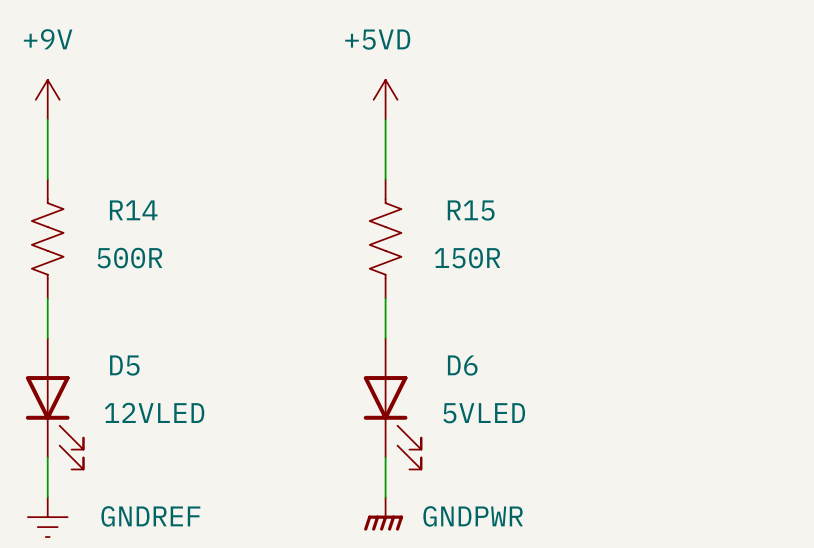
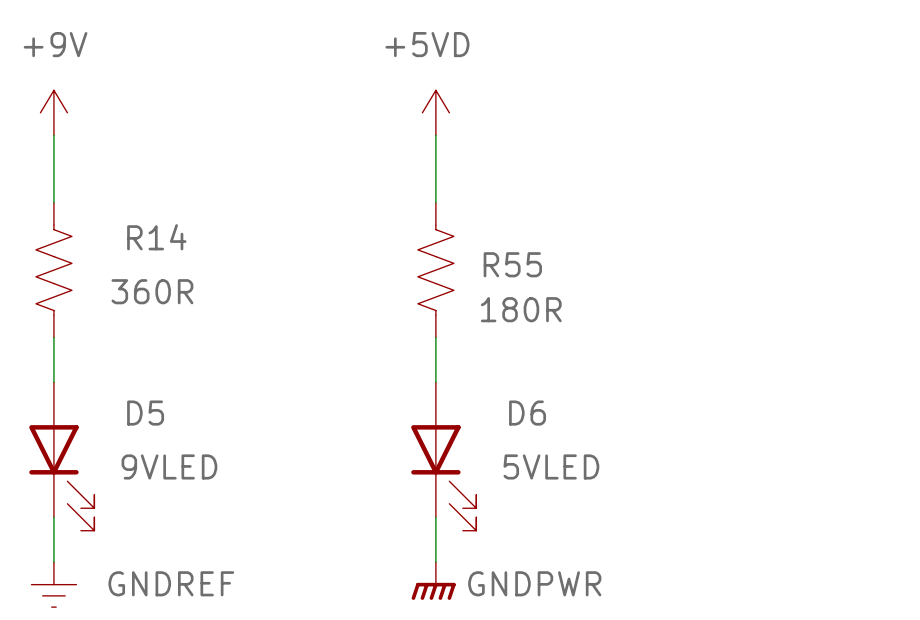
R15 name: R15 (471, 210) -> R55 (512, 264)
R14 value: 500R (129, 258) -> 360R (152, 291)
R15 value: 150R (467, 258) -> 180R (521, 309)
D5 value: 12VLED (154, 412) -> 9VLED (169, 466)

